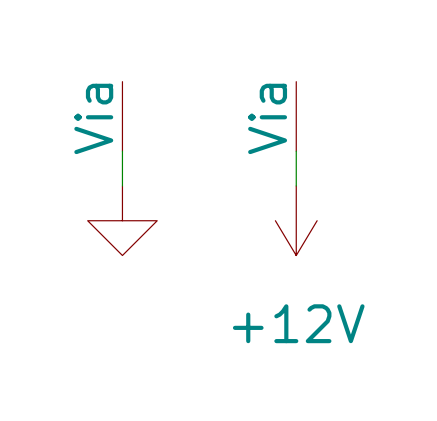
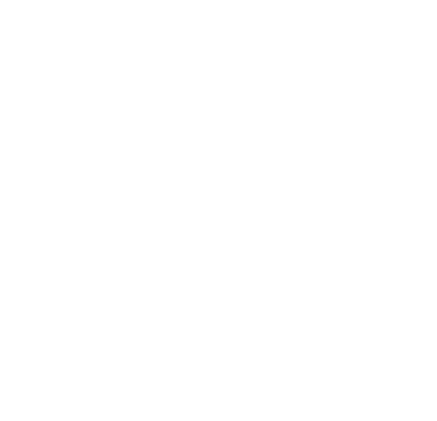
part: (122, 116) -> none
part: (296, 116) -> none
wire: (122, 151) (122, 185) -> none
wire: (296, 151) (296, 185) -> none
power symbol: (122, 220) -> none
power symbol: +12V (296, 220) -> none

